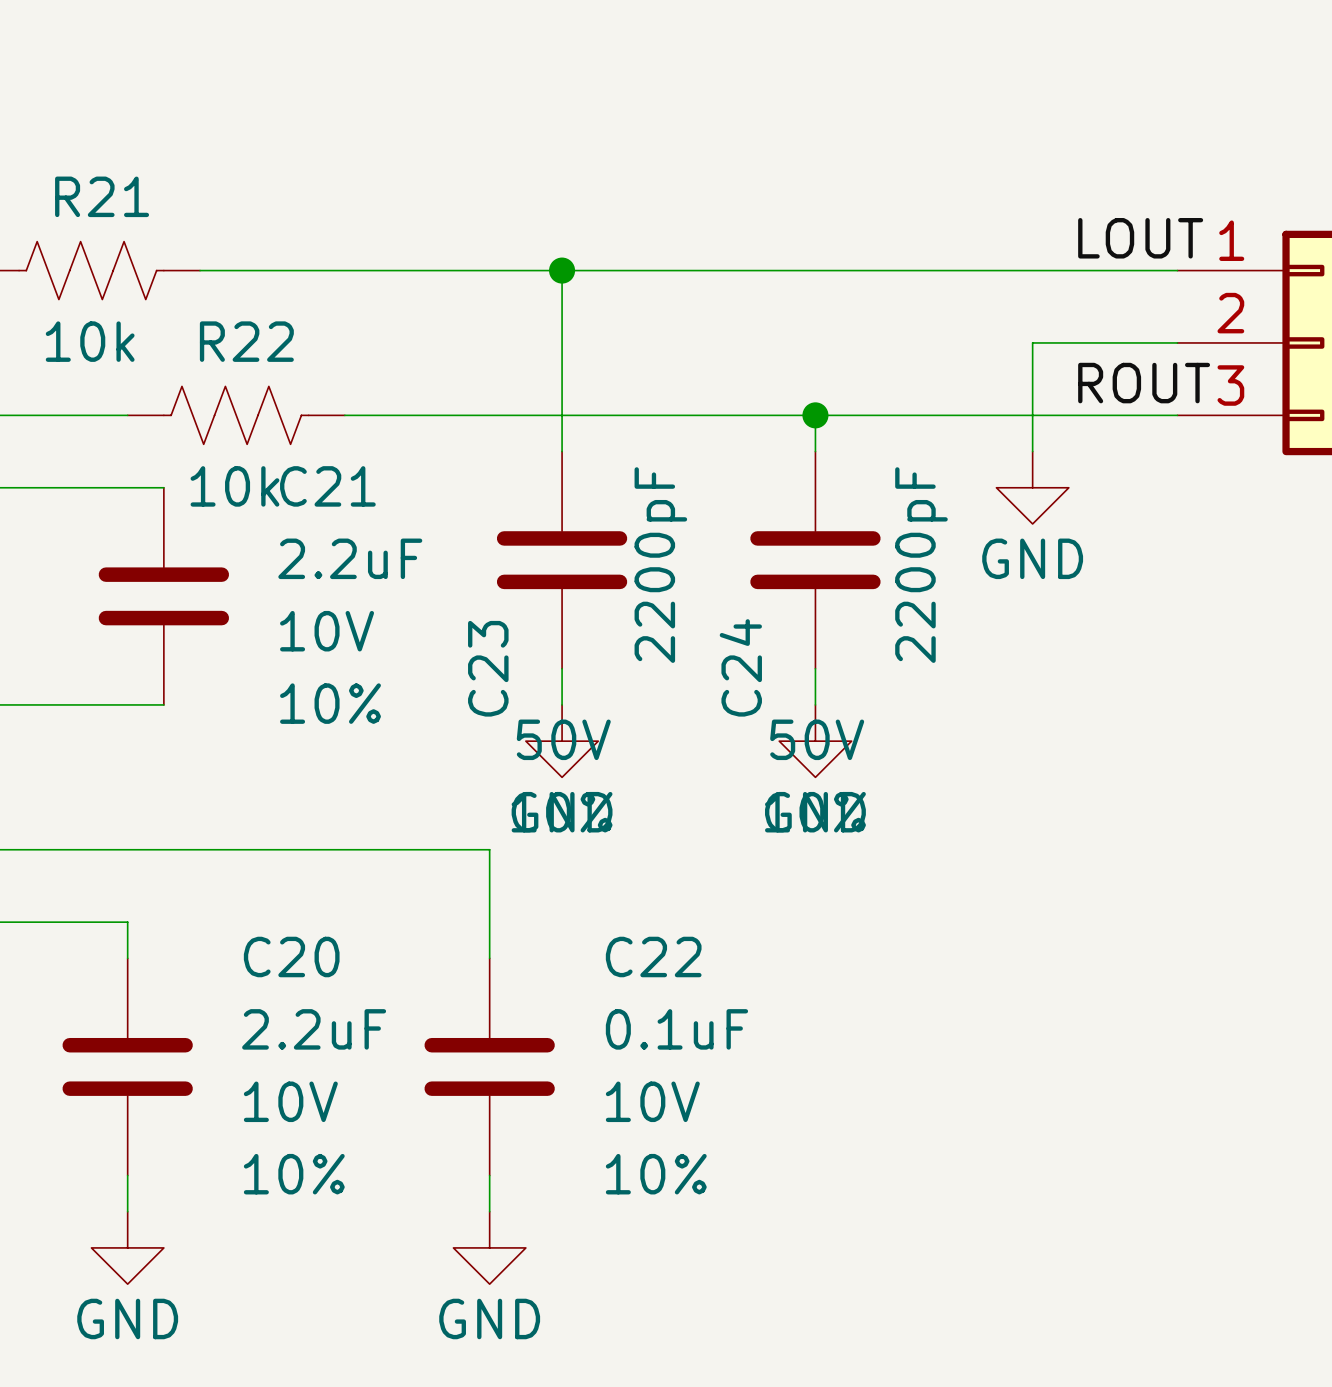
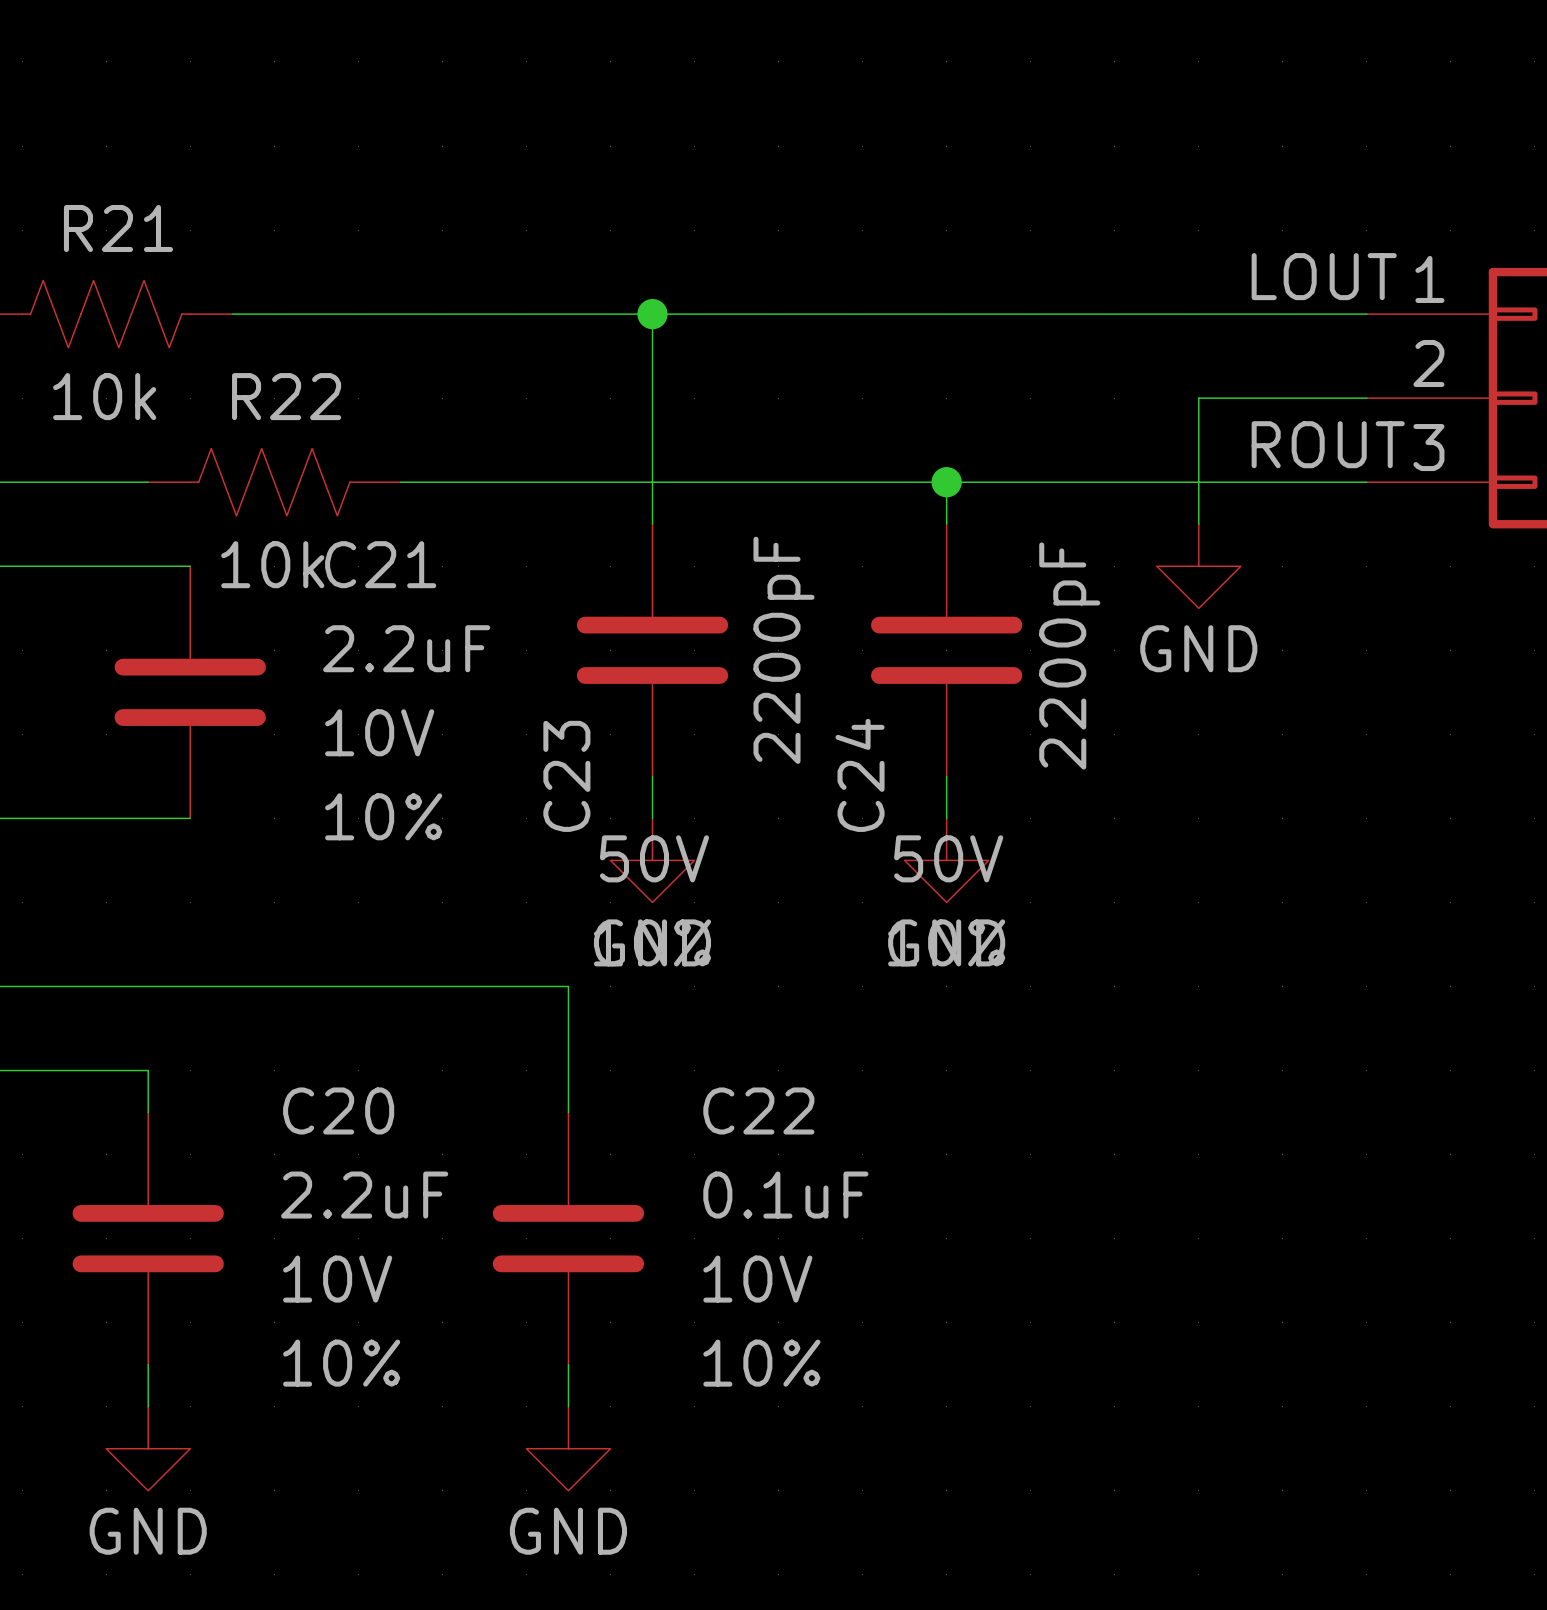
C23 value position: 2200pF (660, 565) -> 2200pF (784, 650)

